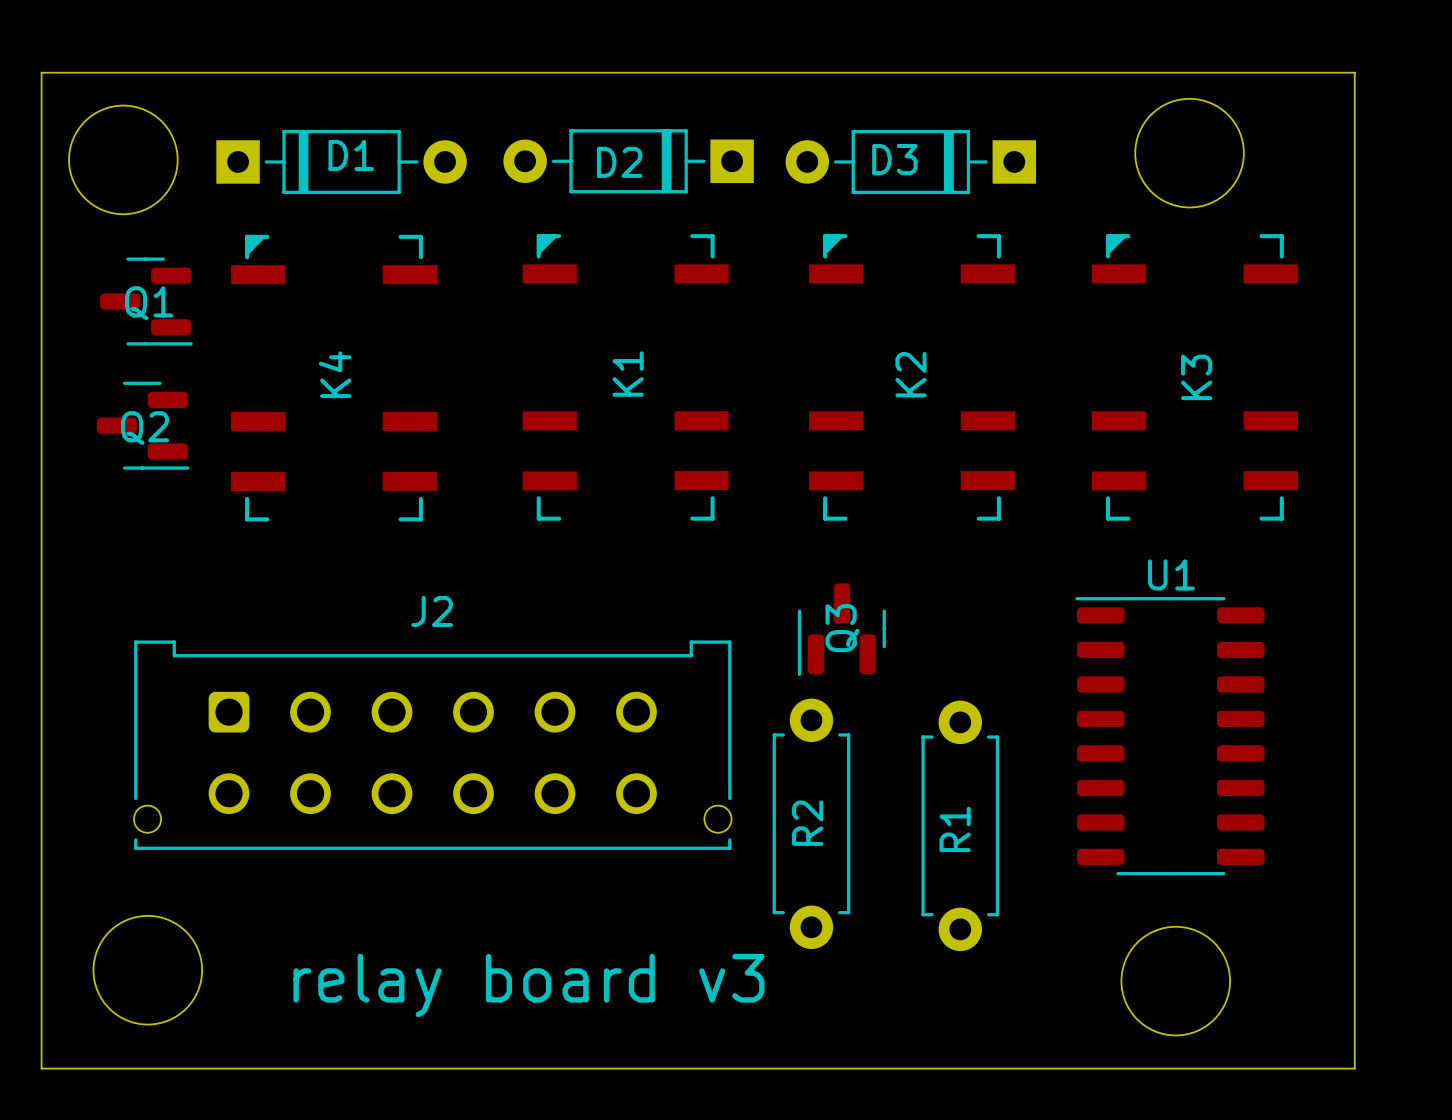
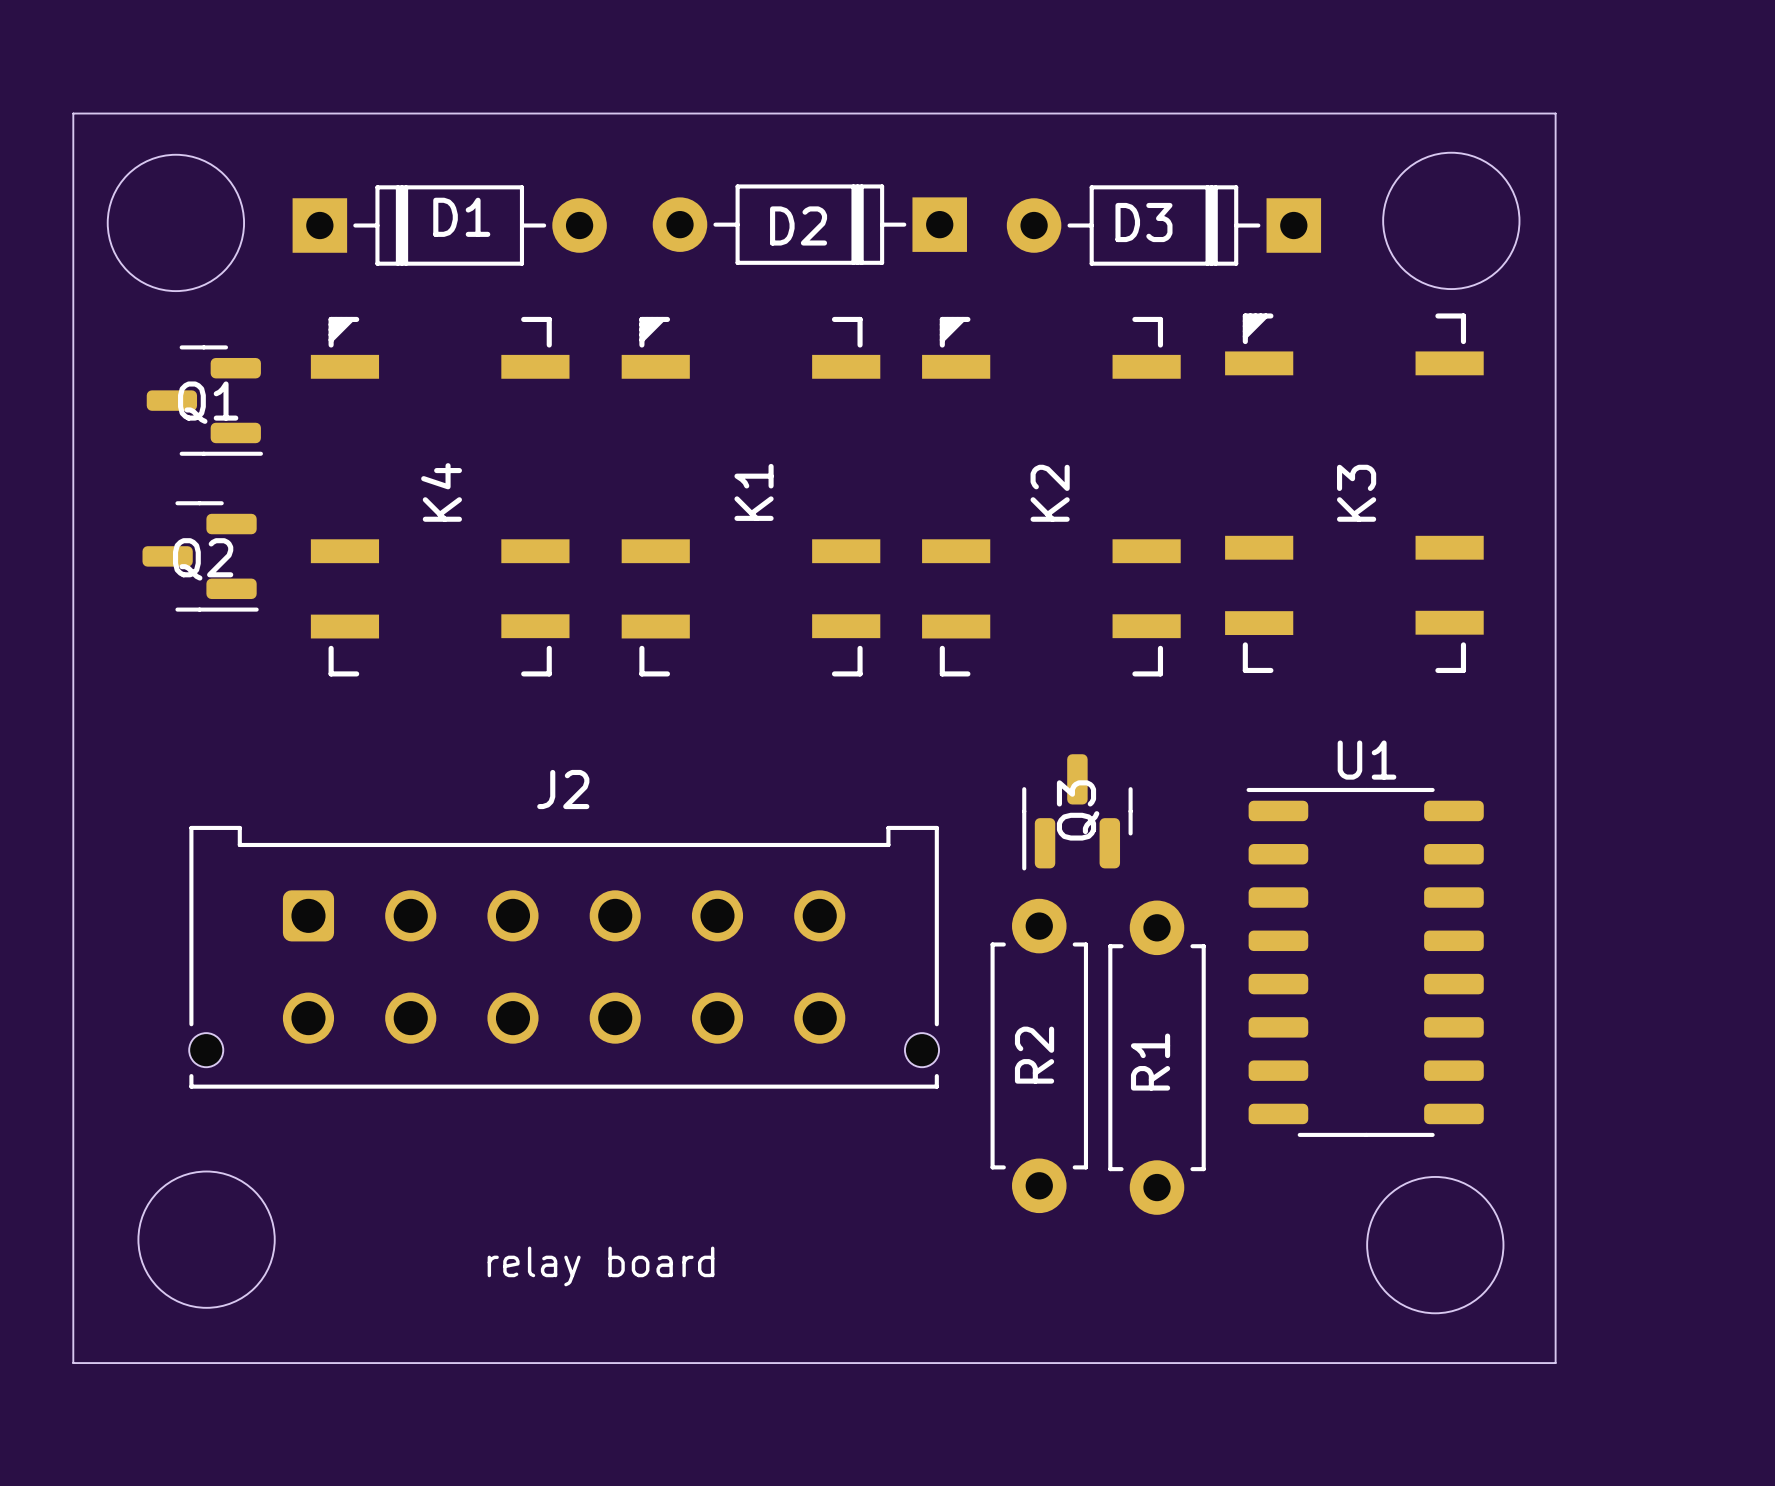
board edge: (1222, 72) (1354, 72) (1354, 1068) (1222, 1068) -> (1555, 113) (1555, 1363)
round board edge position: (1189, 153) -> (1451, 220)
K1 position: (625, 377) -> (750, 496)
K2 position: (911, 377) -> (1051, 496)
K3 position: (1194, 377) -> (1354, 493)
U1 position: (1169, 736) -> (1365, 962)
R1 position: (960, 825) -> (1157, 1057)
round board edge position: (1175, 981) -> (1435, 1245)
text: relay board v3 (528, 985) -> relay board (601, 1266)

